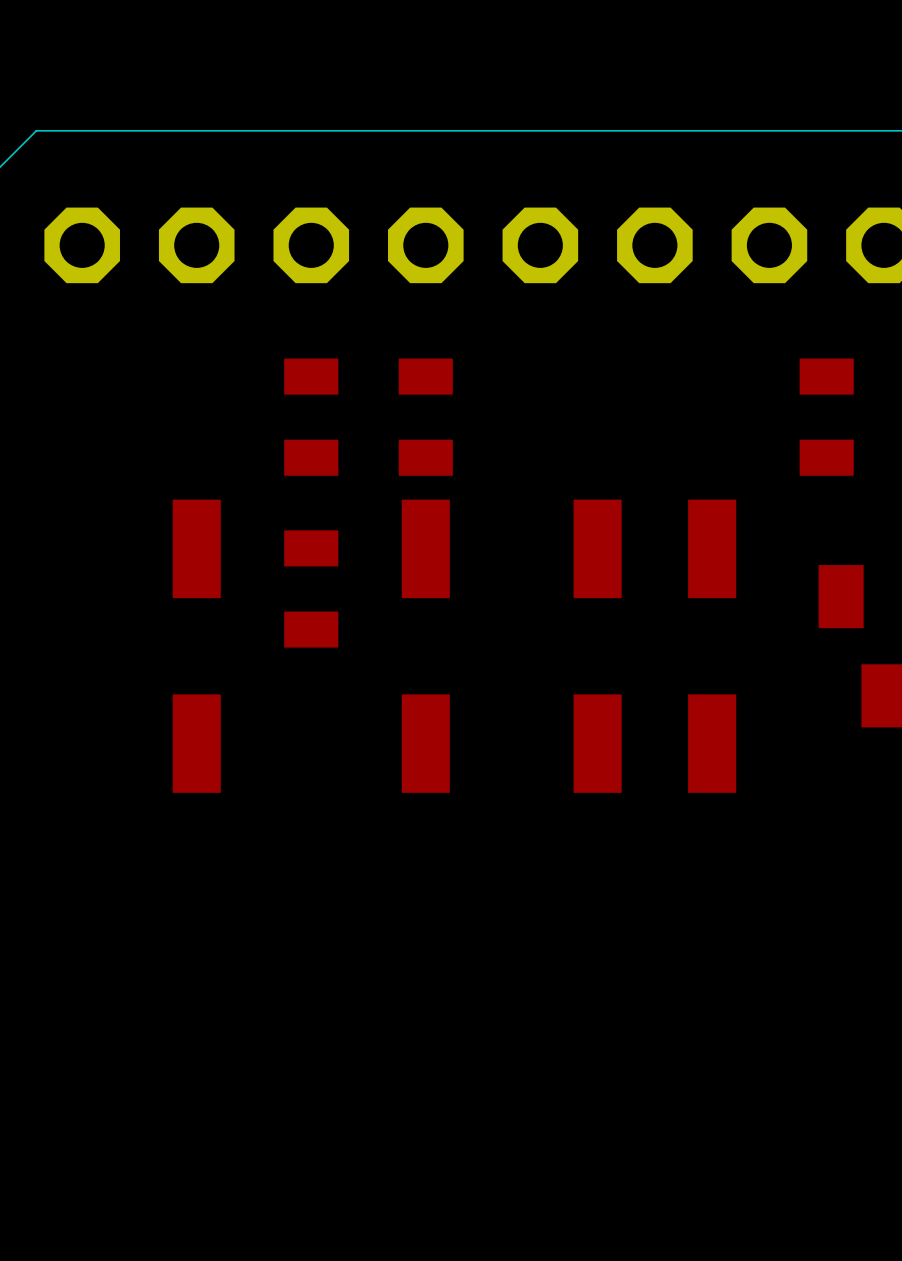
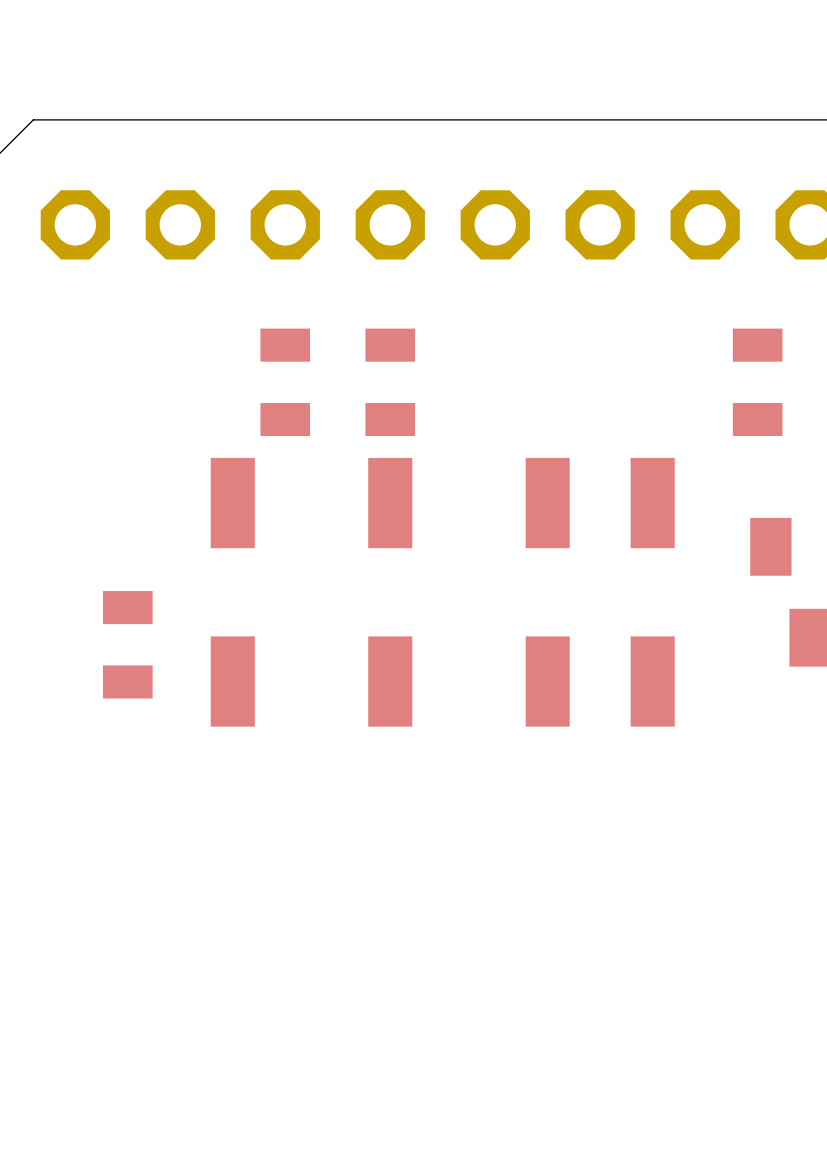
part position: (311, 588) -> (127, 644)
part position: (196, 646) -> (232, 592)

